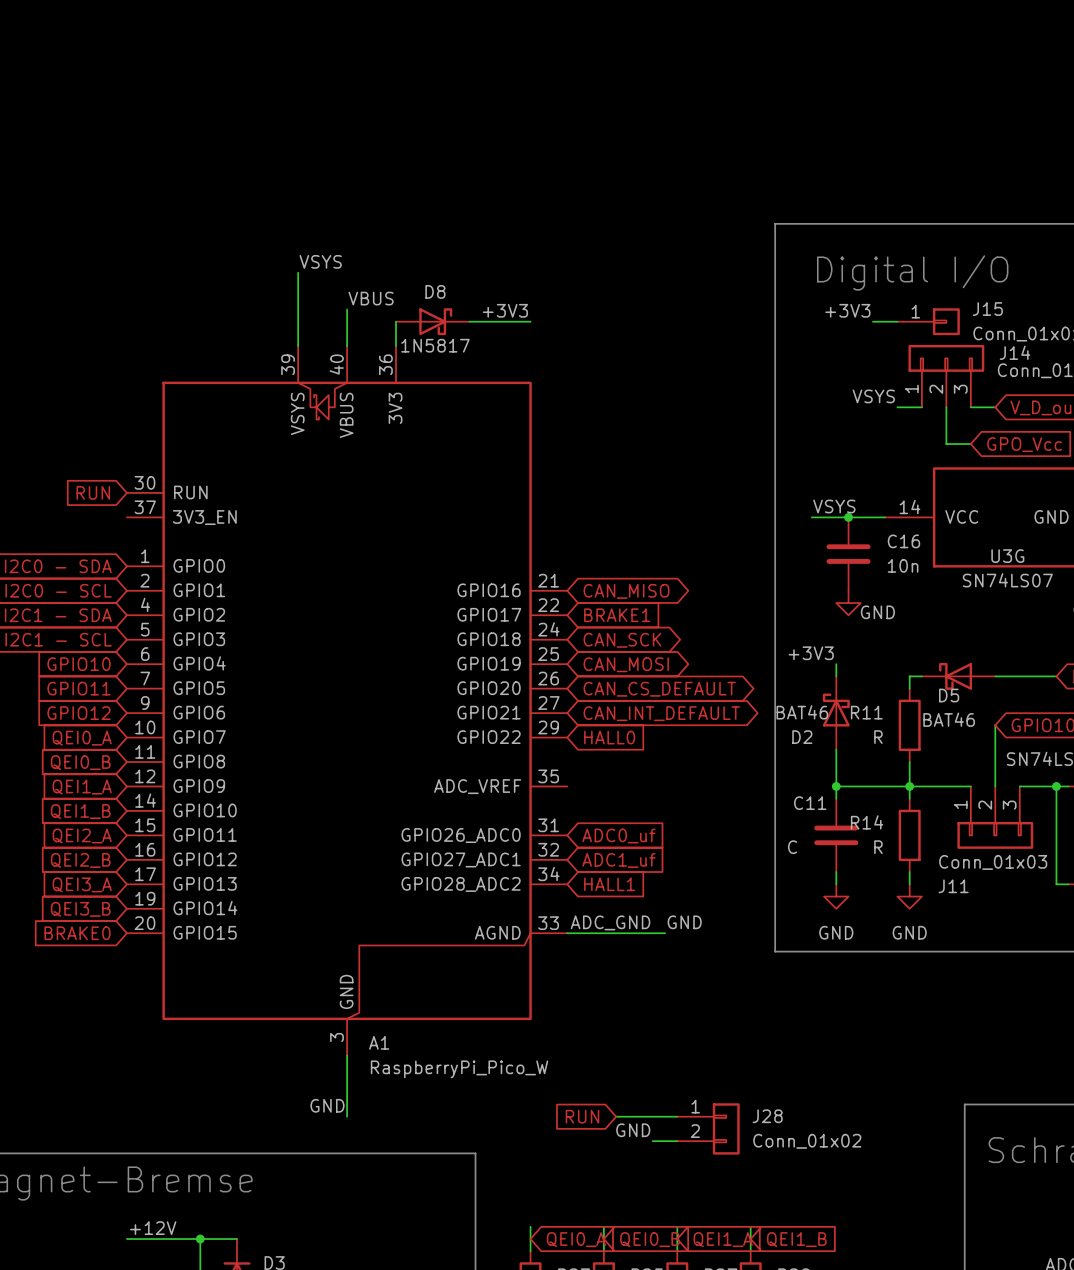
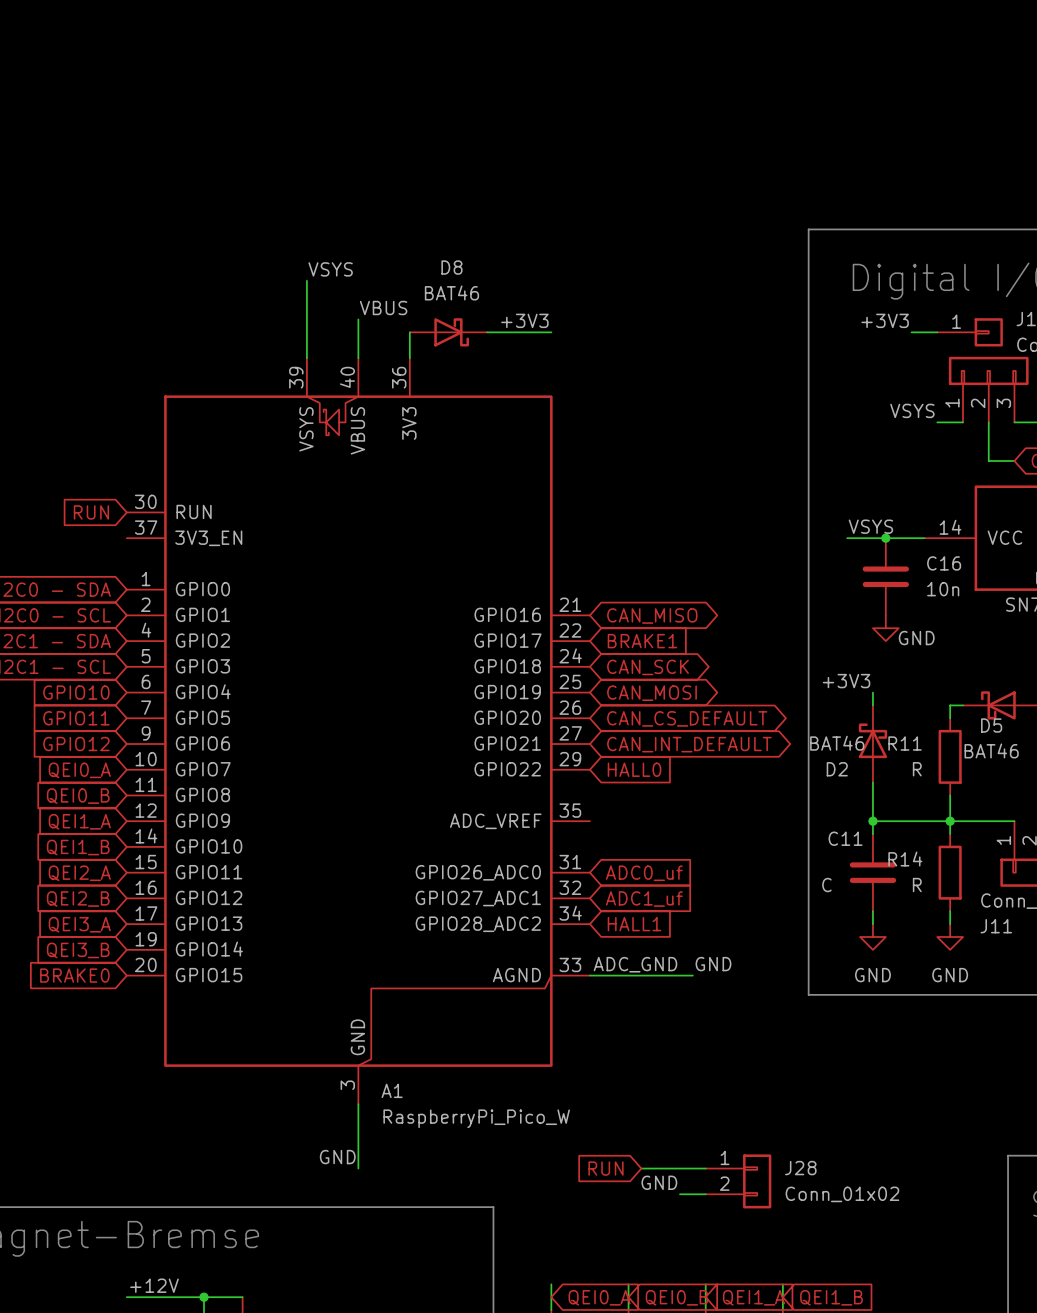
D8 name position: D8 (435, 291) -> D8 (451, 267)
D8 flip: as is (435, 321) -> up-down (451, 332)
D8 value: 1N5817 (435, 345) -> BAT46 (451, 292)

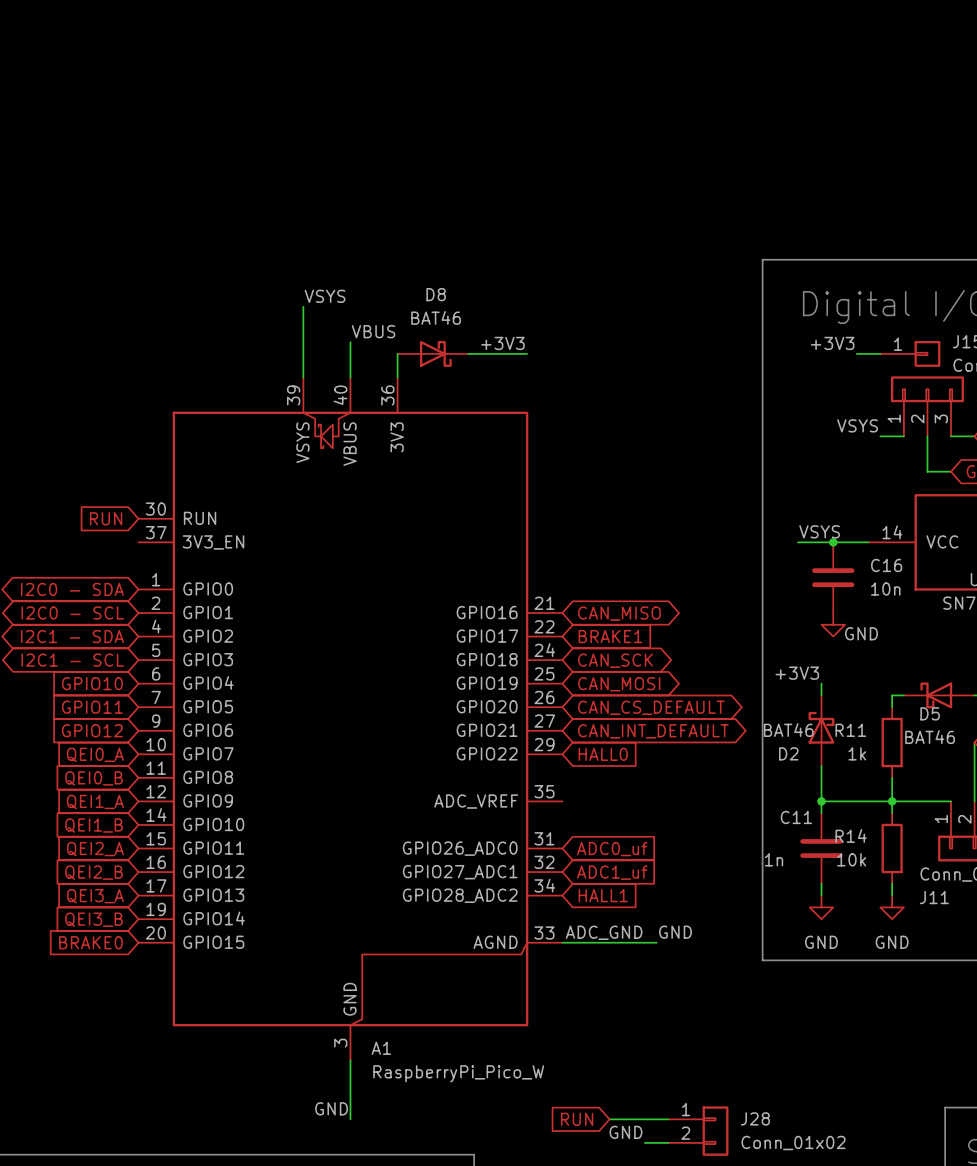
R11 value: R (917, 769) -> 1k (857, 753)
C11 value: C (826, 885) -> 1n (774, 859)
R14 value: R (917, 885) -> 10k (851, 859)

